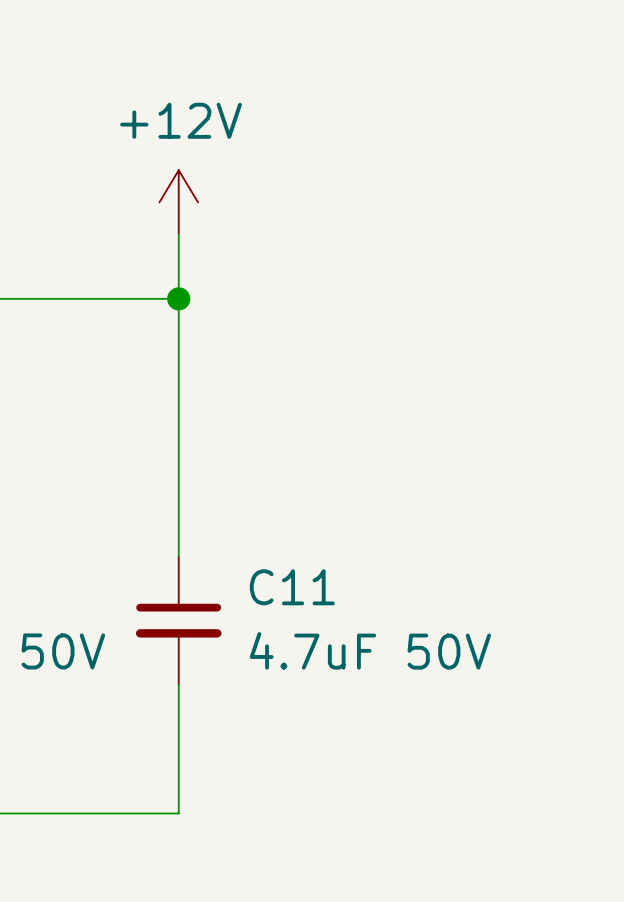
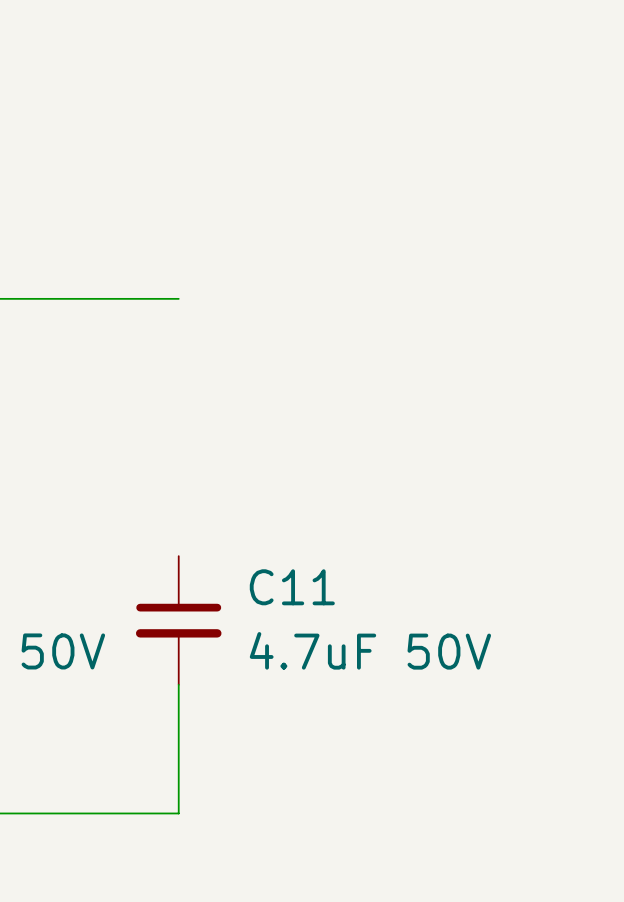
power symbol: +12V (178, 202) -> none
wire: (178, 234) (178, 556) -> none
junction: (178, 298) -> none

